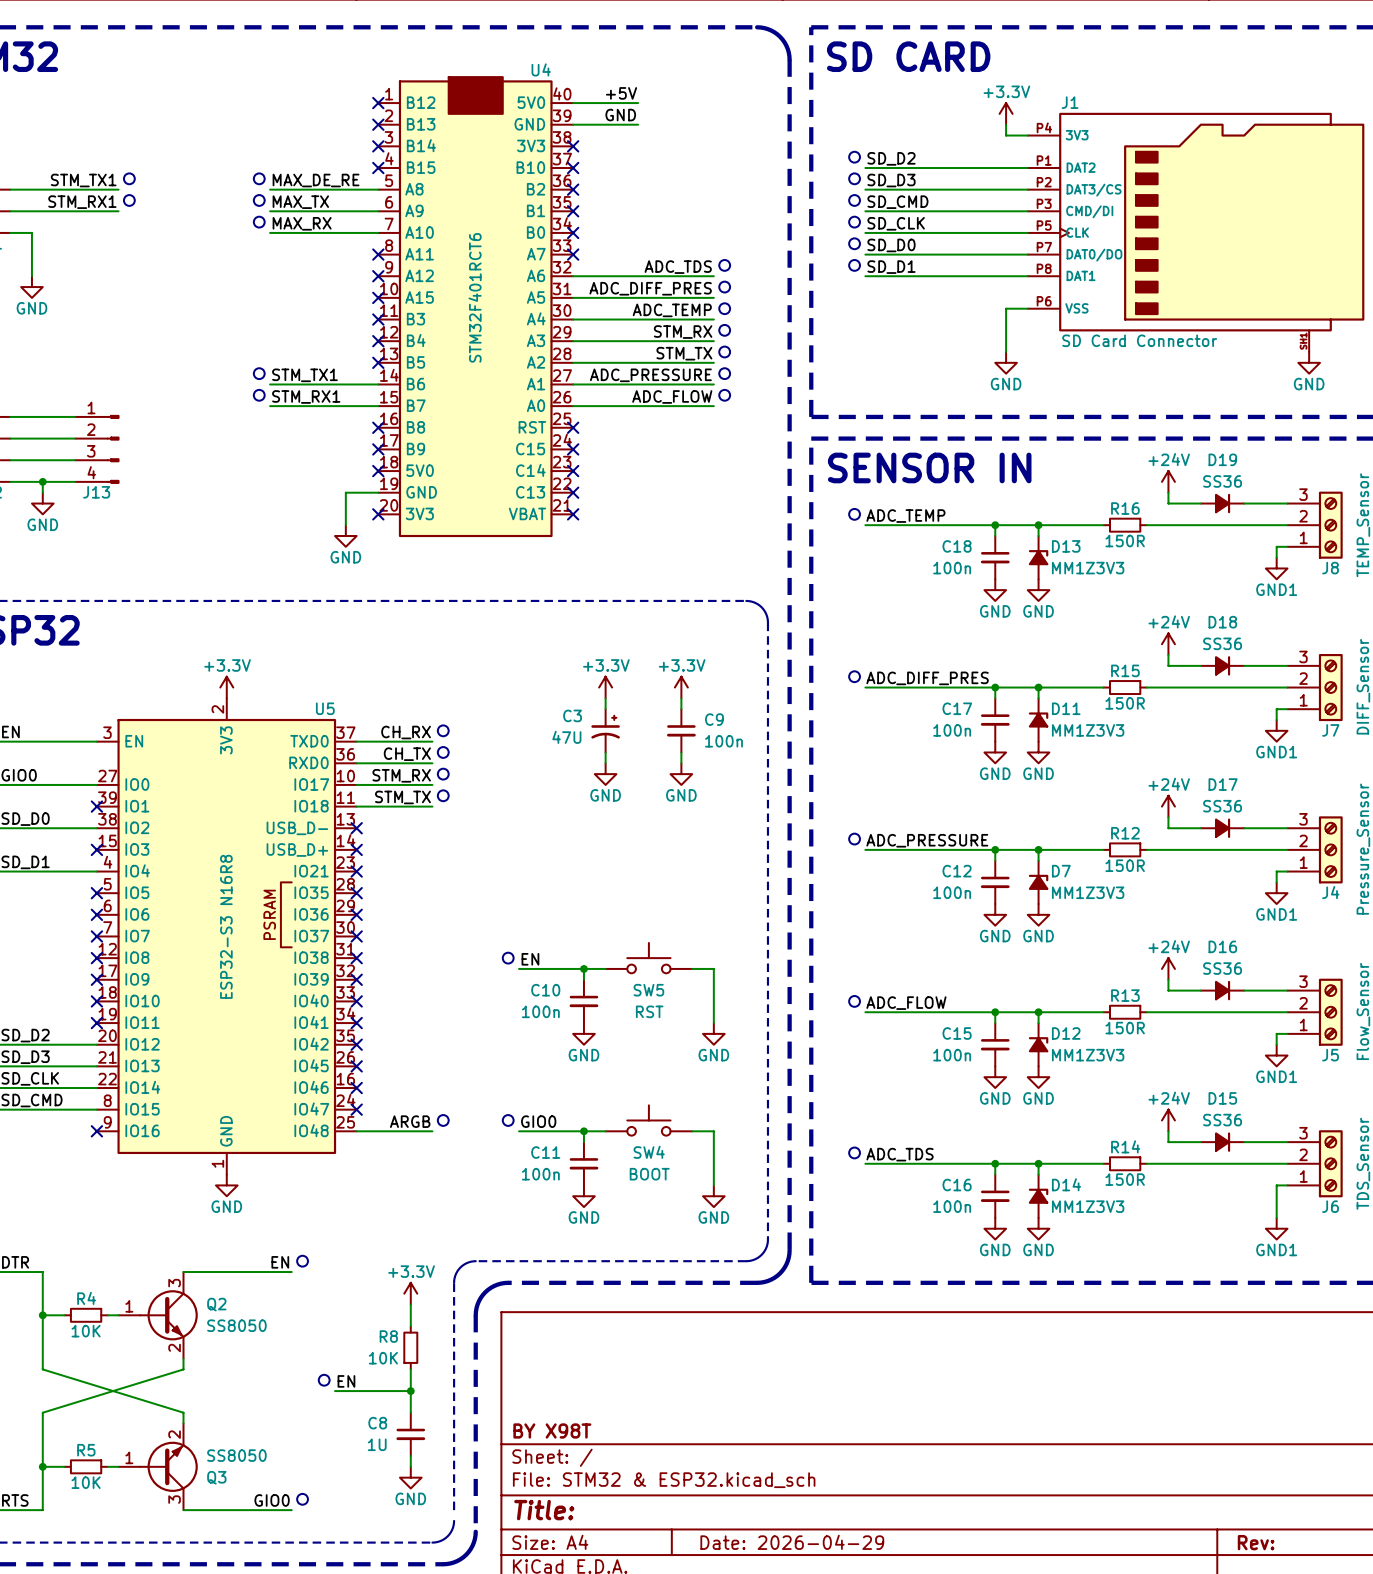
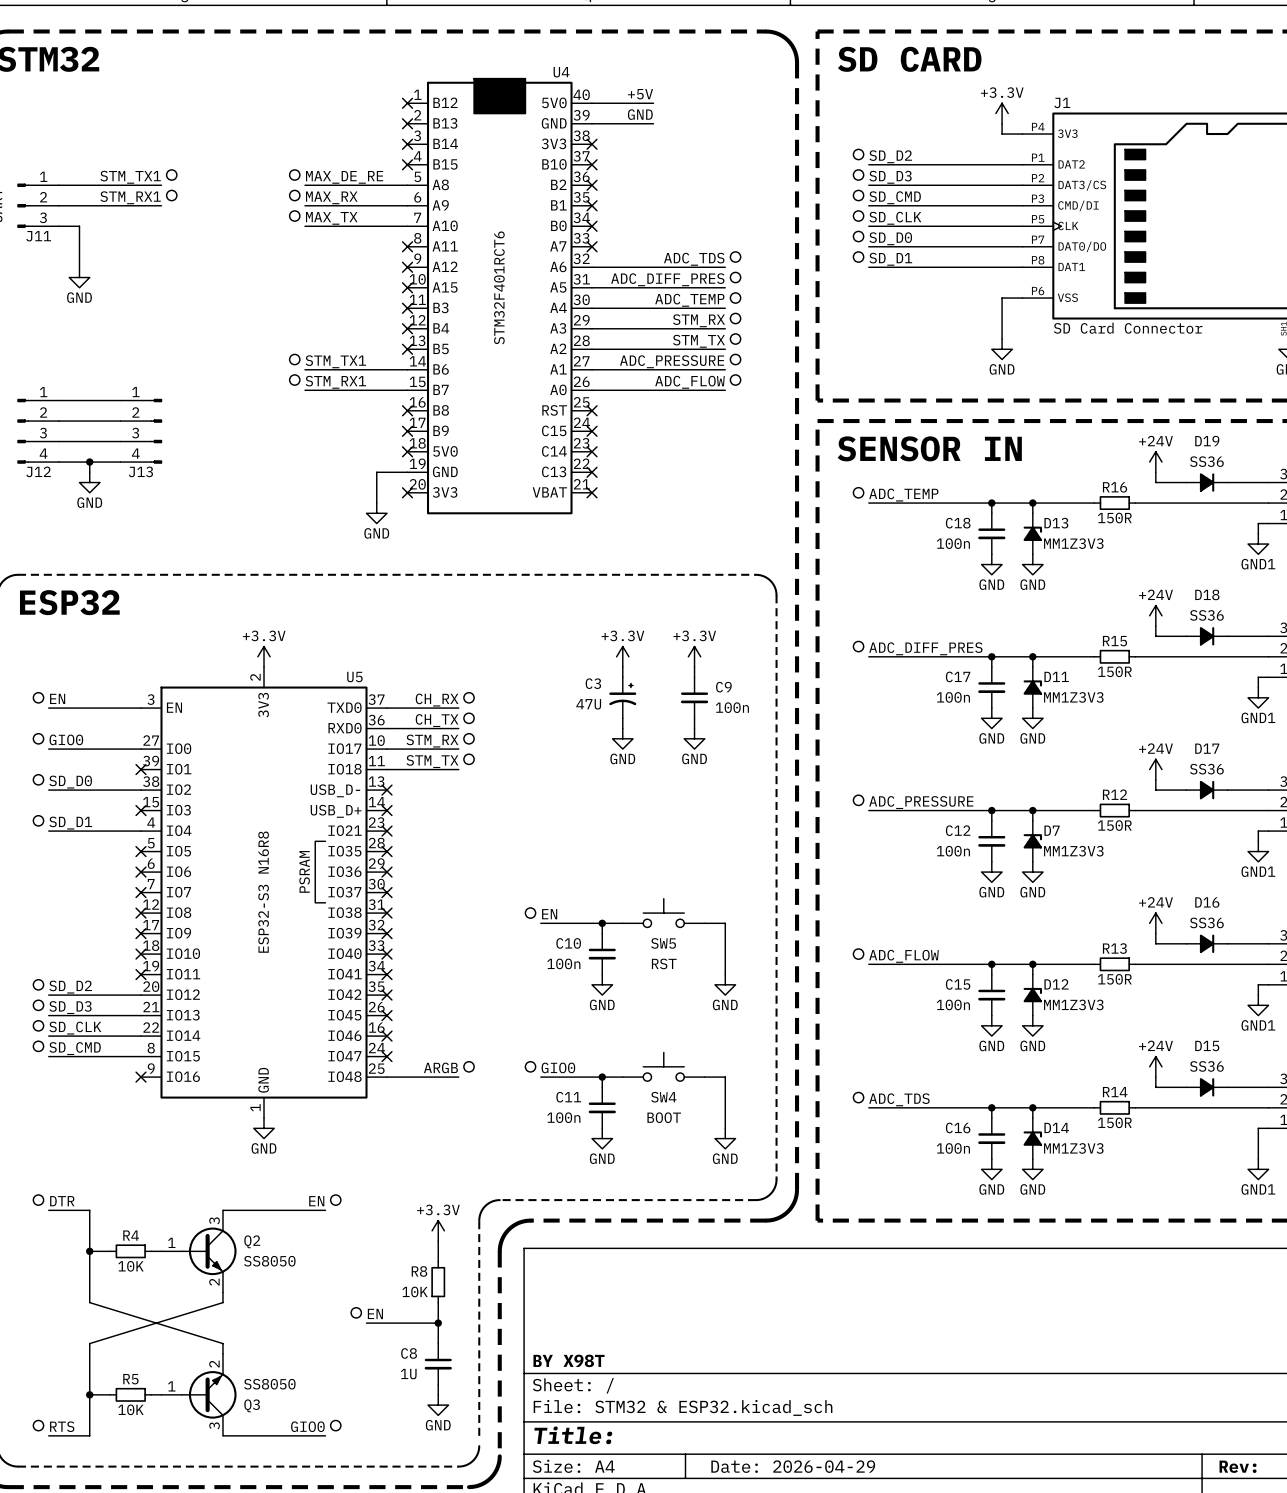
label: MAX_TX (300, 202) -> MAX_RX (331, 197)
label: MAX_RX (302, 223) -> MAX_TX (331, 218)

